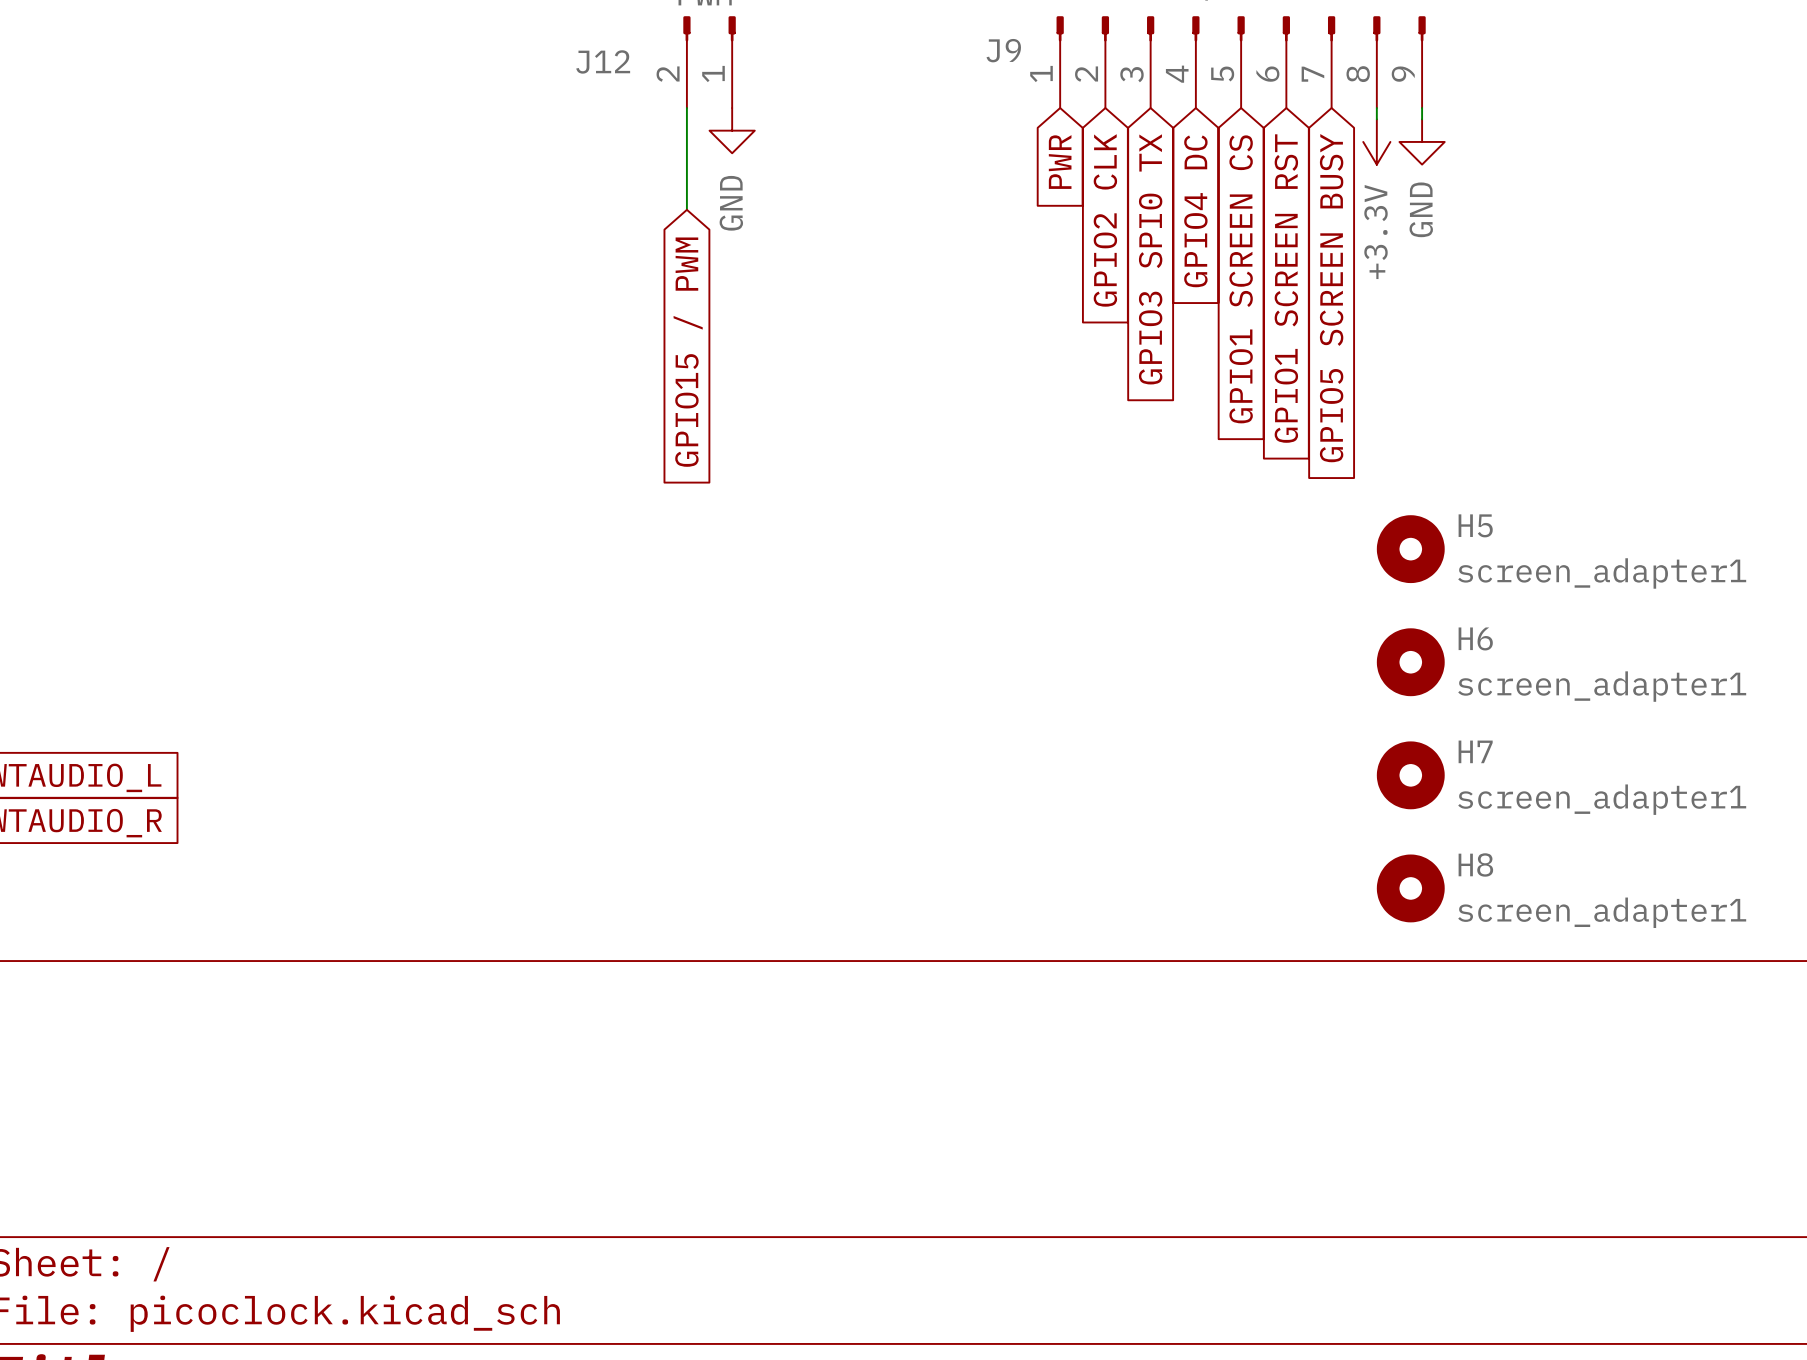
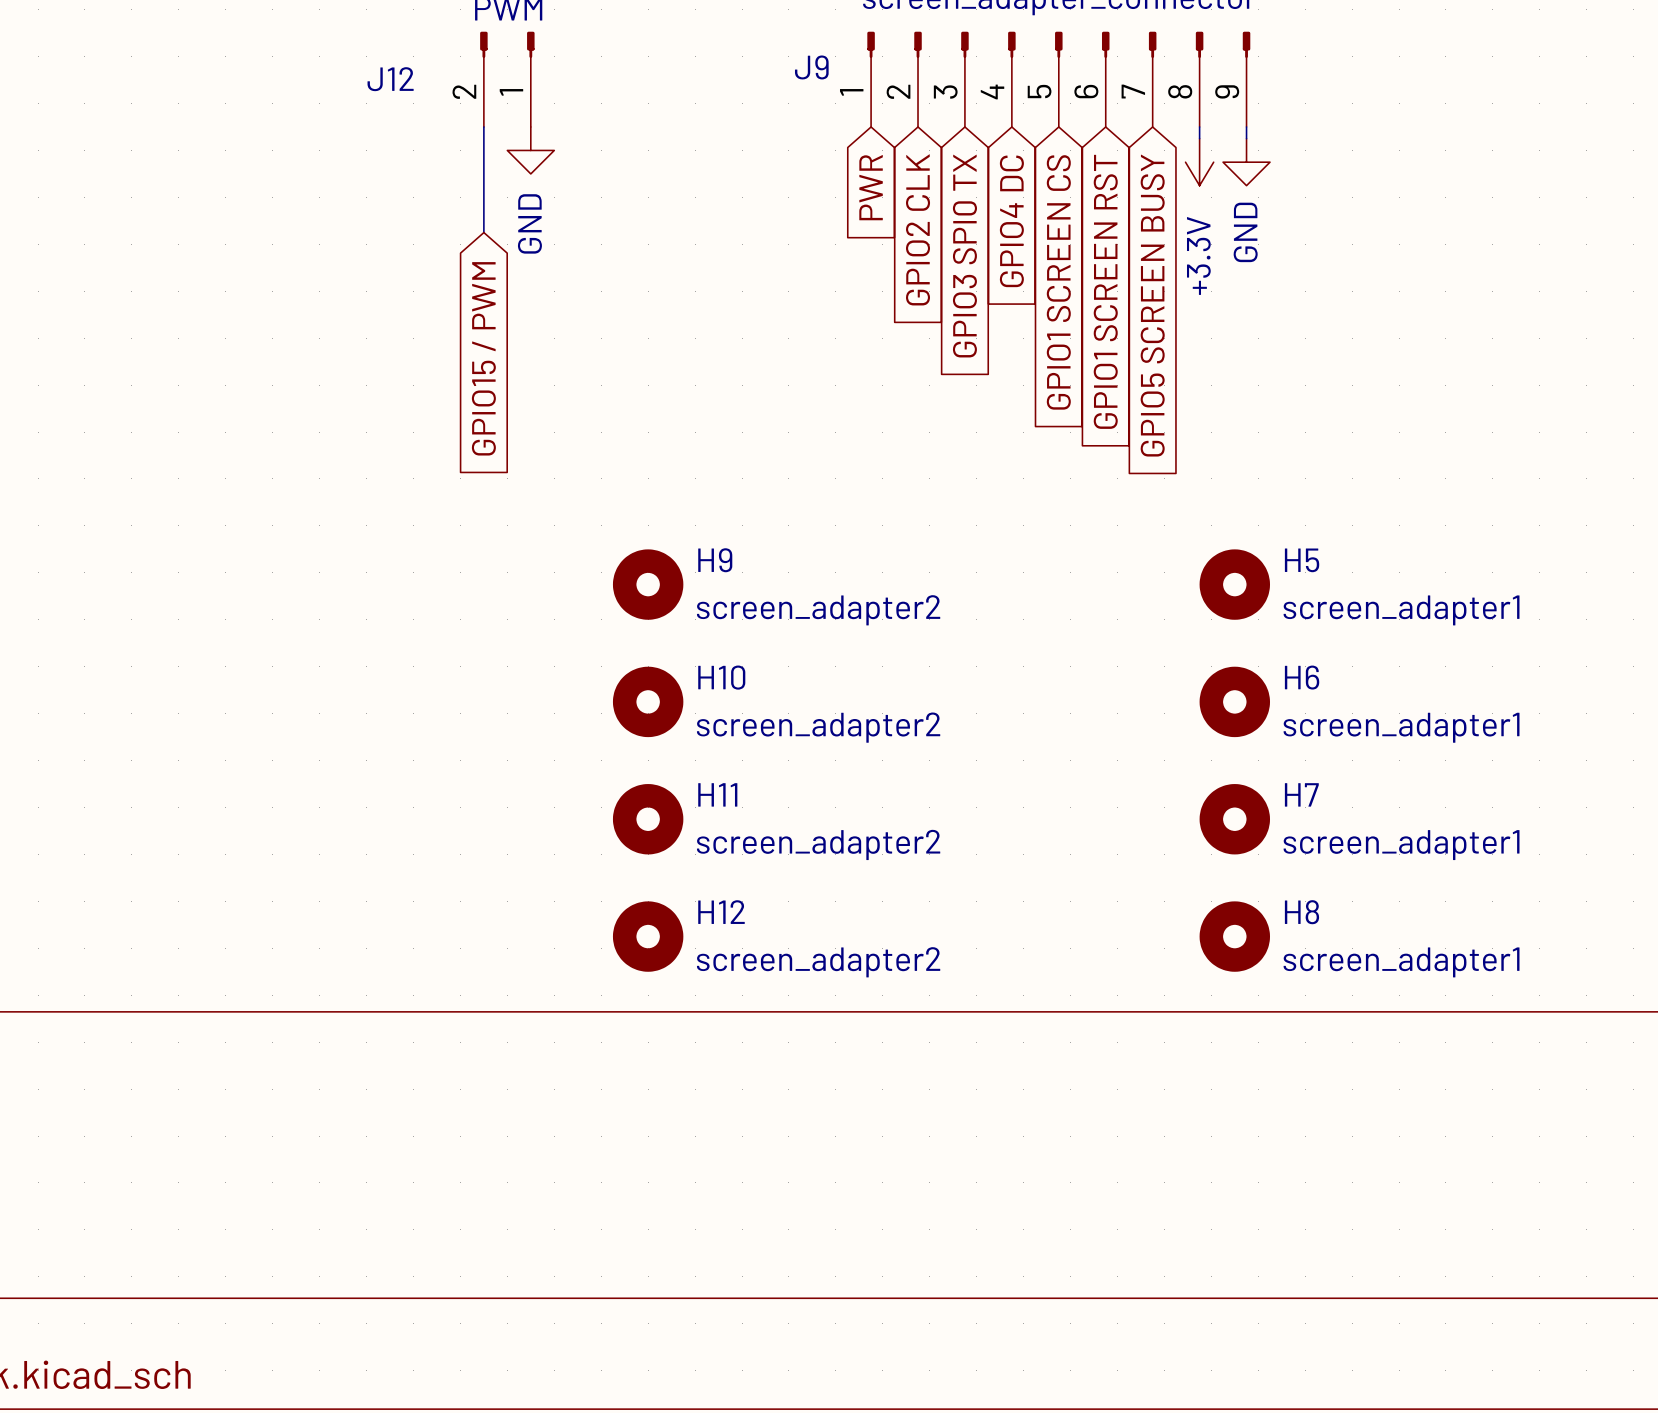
H9: none -> screen_adapter2 (648, 584)
H10: none -> screen_adapter2 (648, 701)
H11: none -> screen_adapter2 (648, 819)
H12: none -> screen_adapter2 (648, 936)

